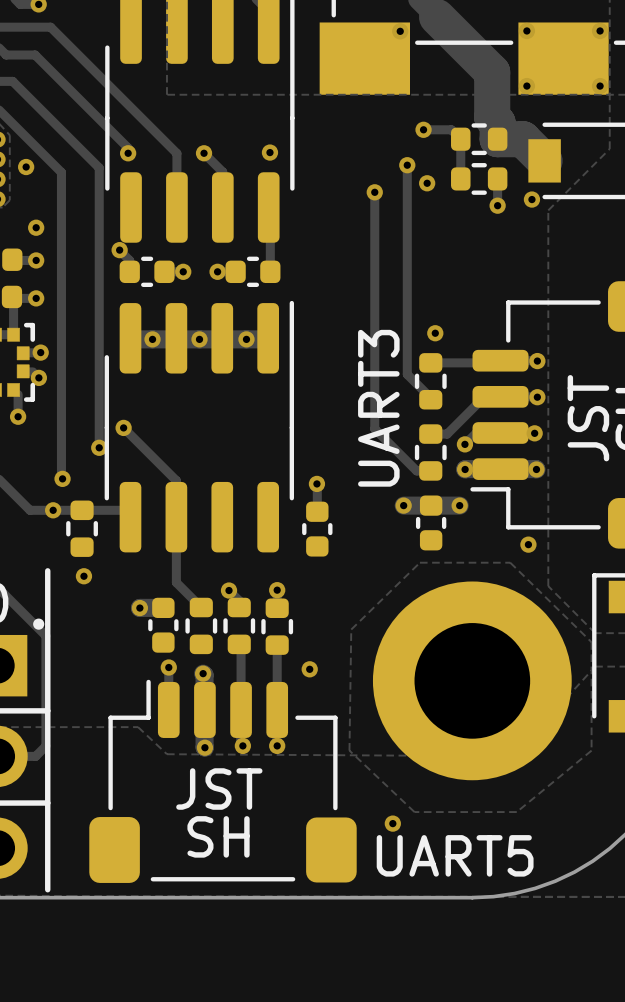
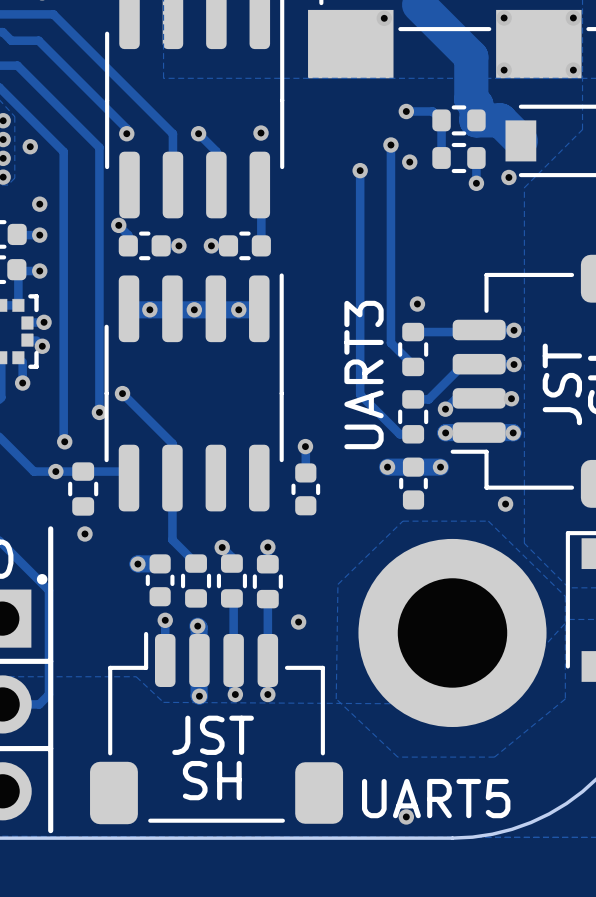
via position: (392, 823) -> (406, 816)

